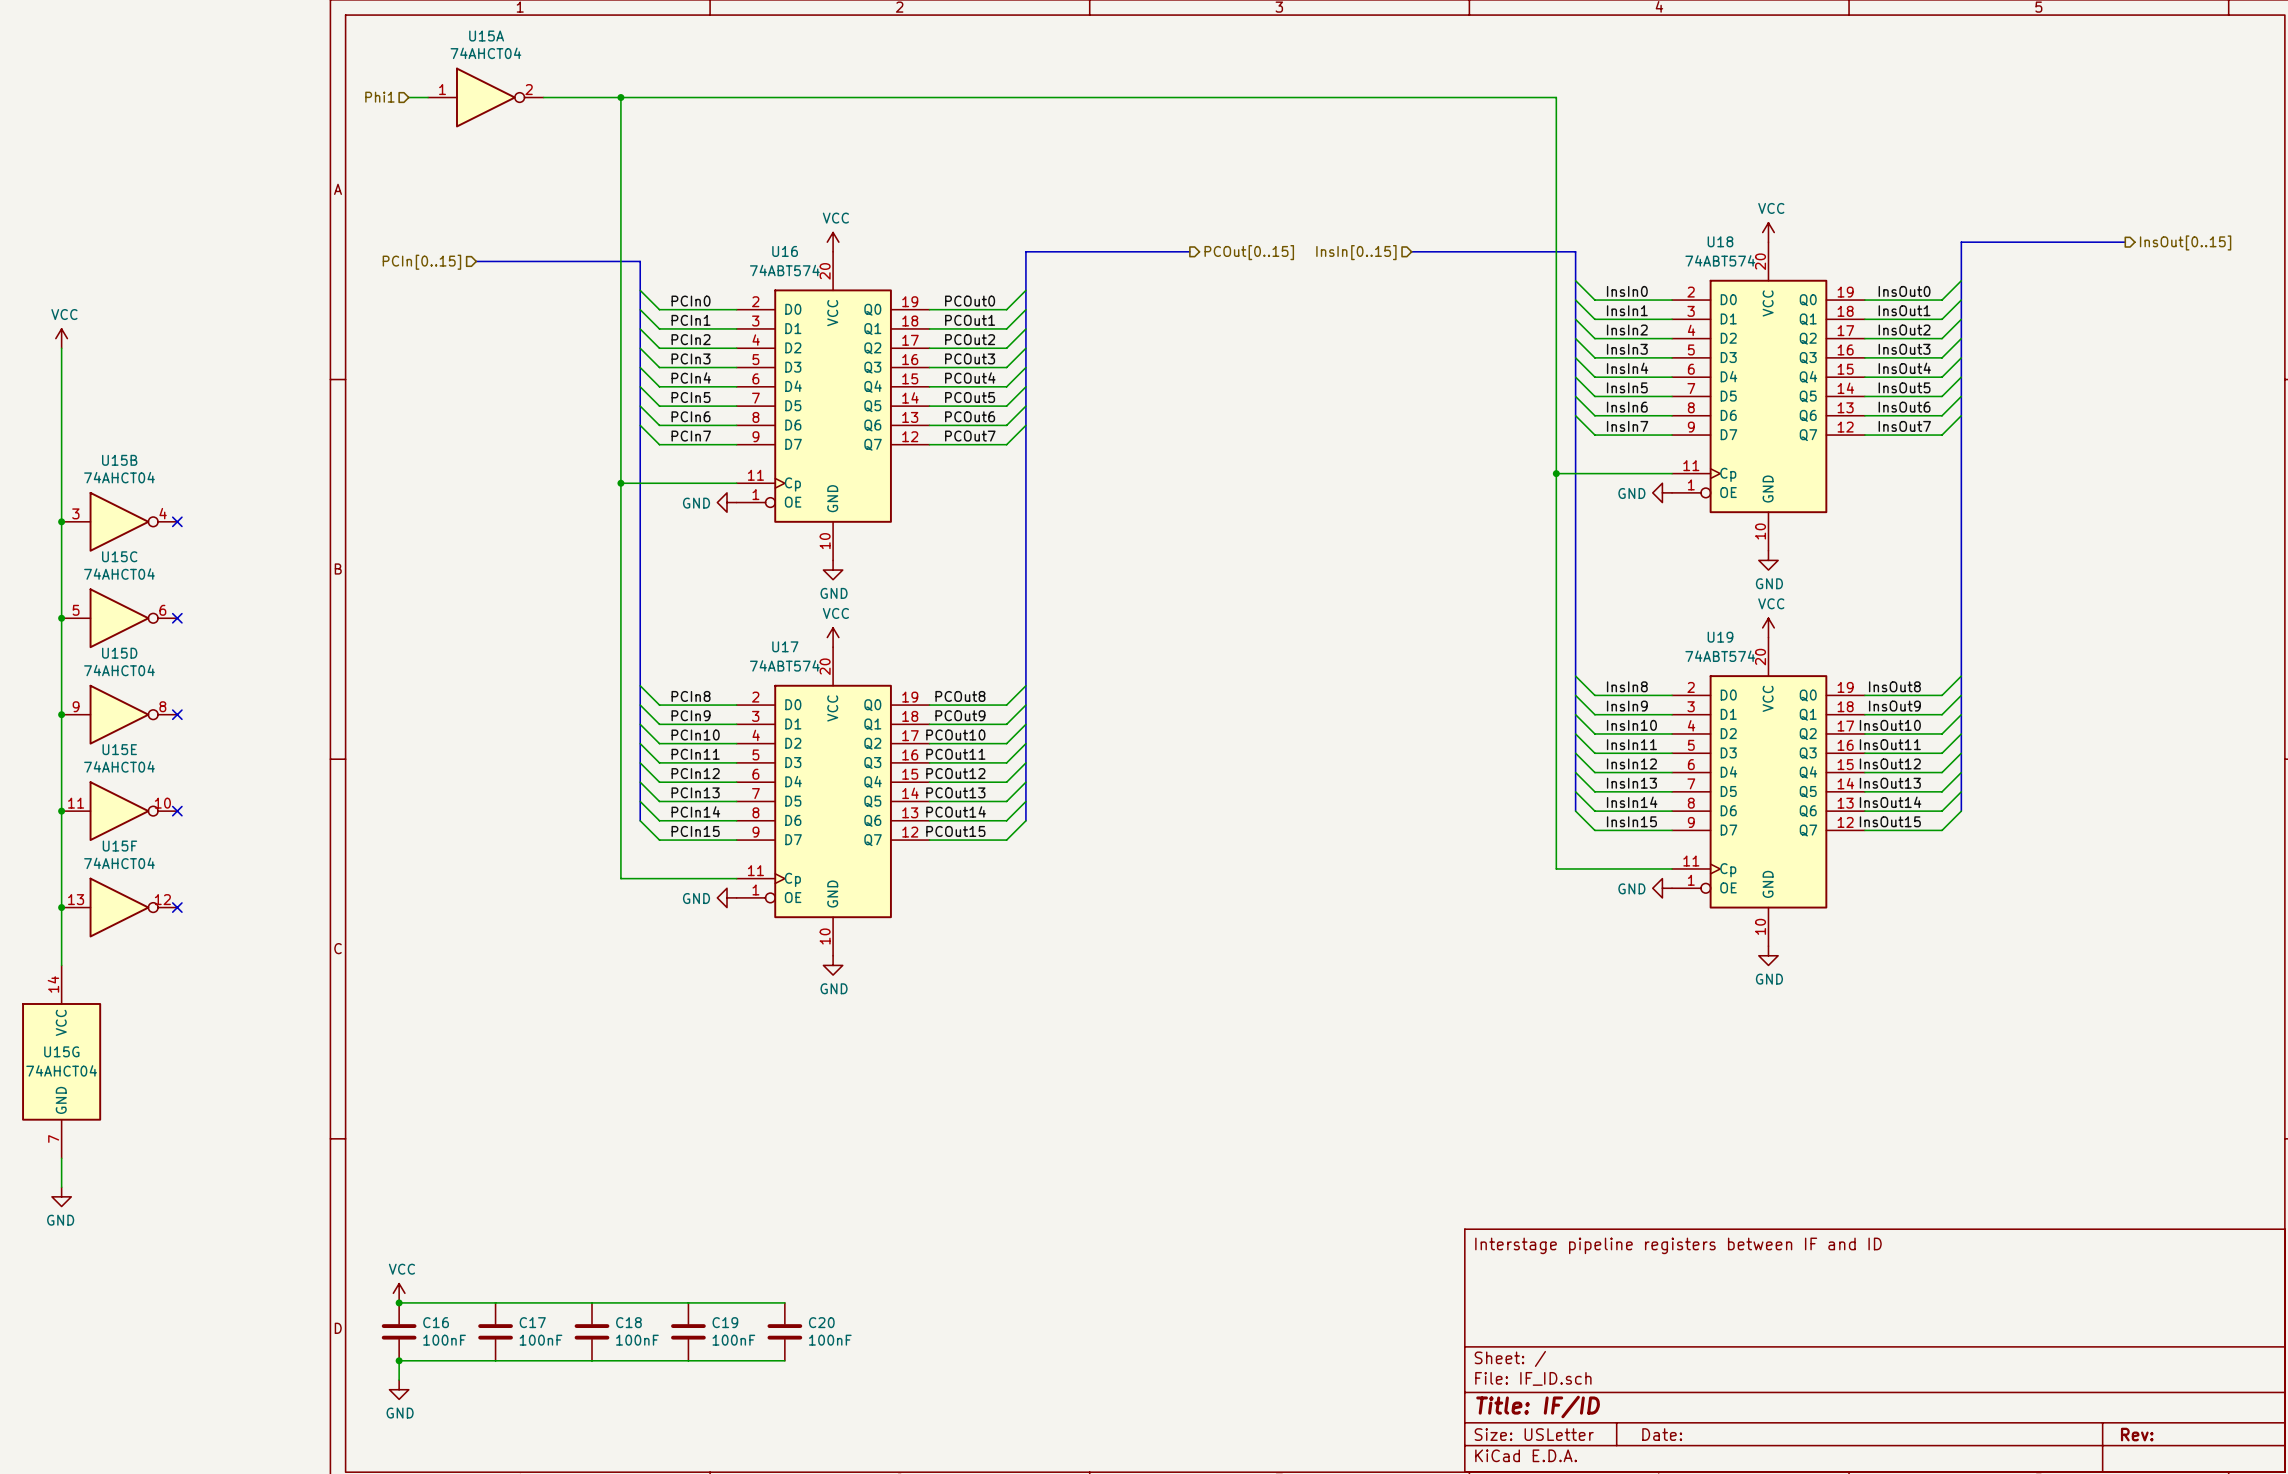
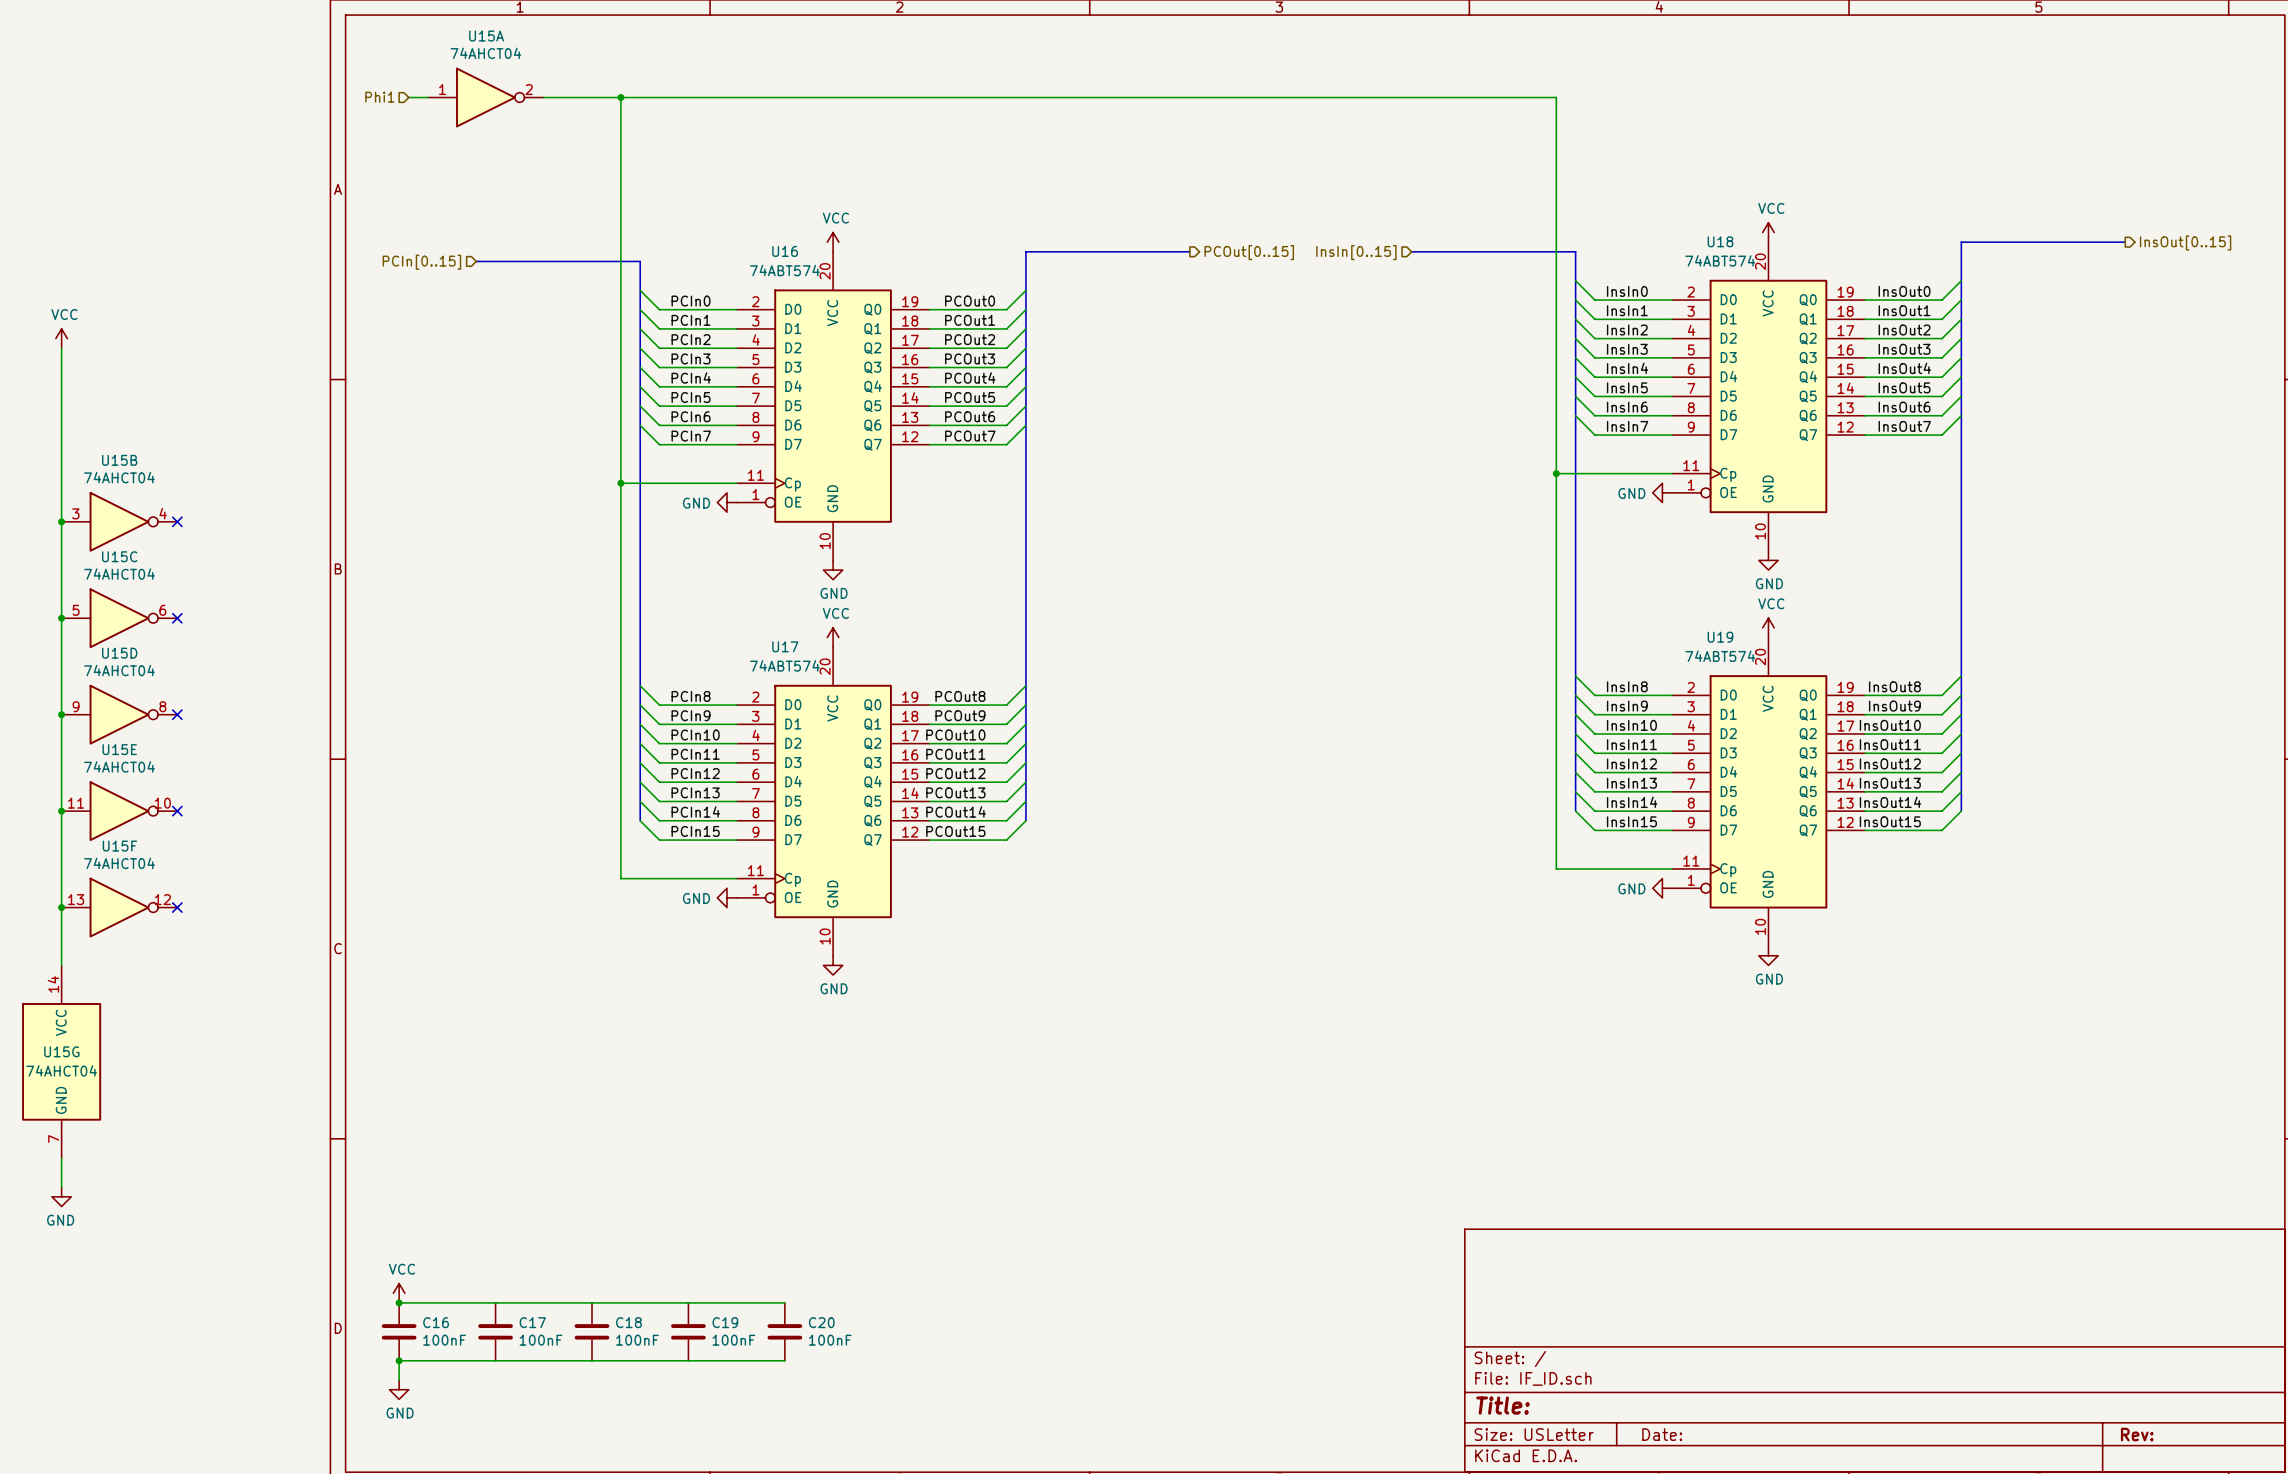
title block: Interstage pipeline registers between IF and ID (1678, 1245) -> none
title block: Title: IF/ID (1538, 1407) -> Title: (1503, 1405)

